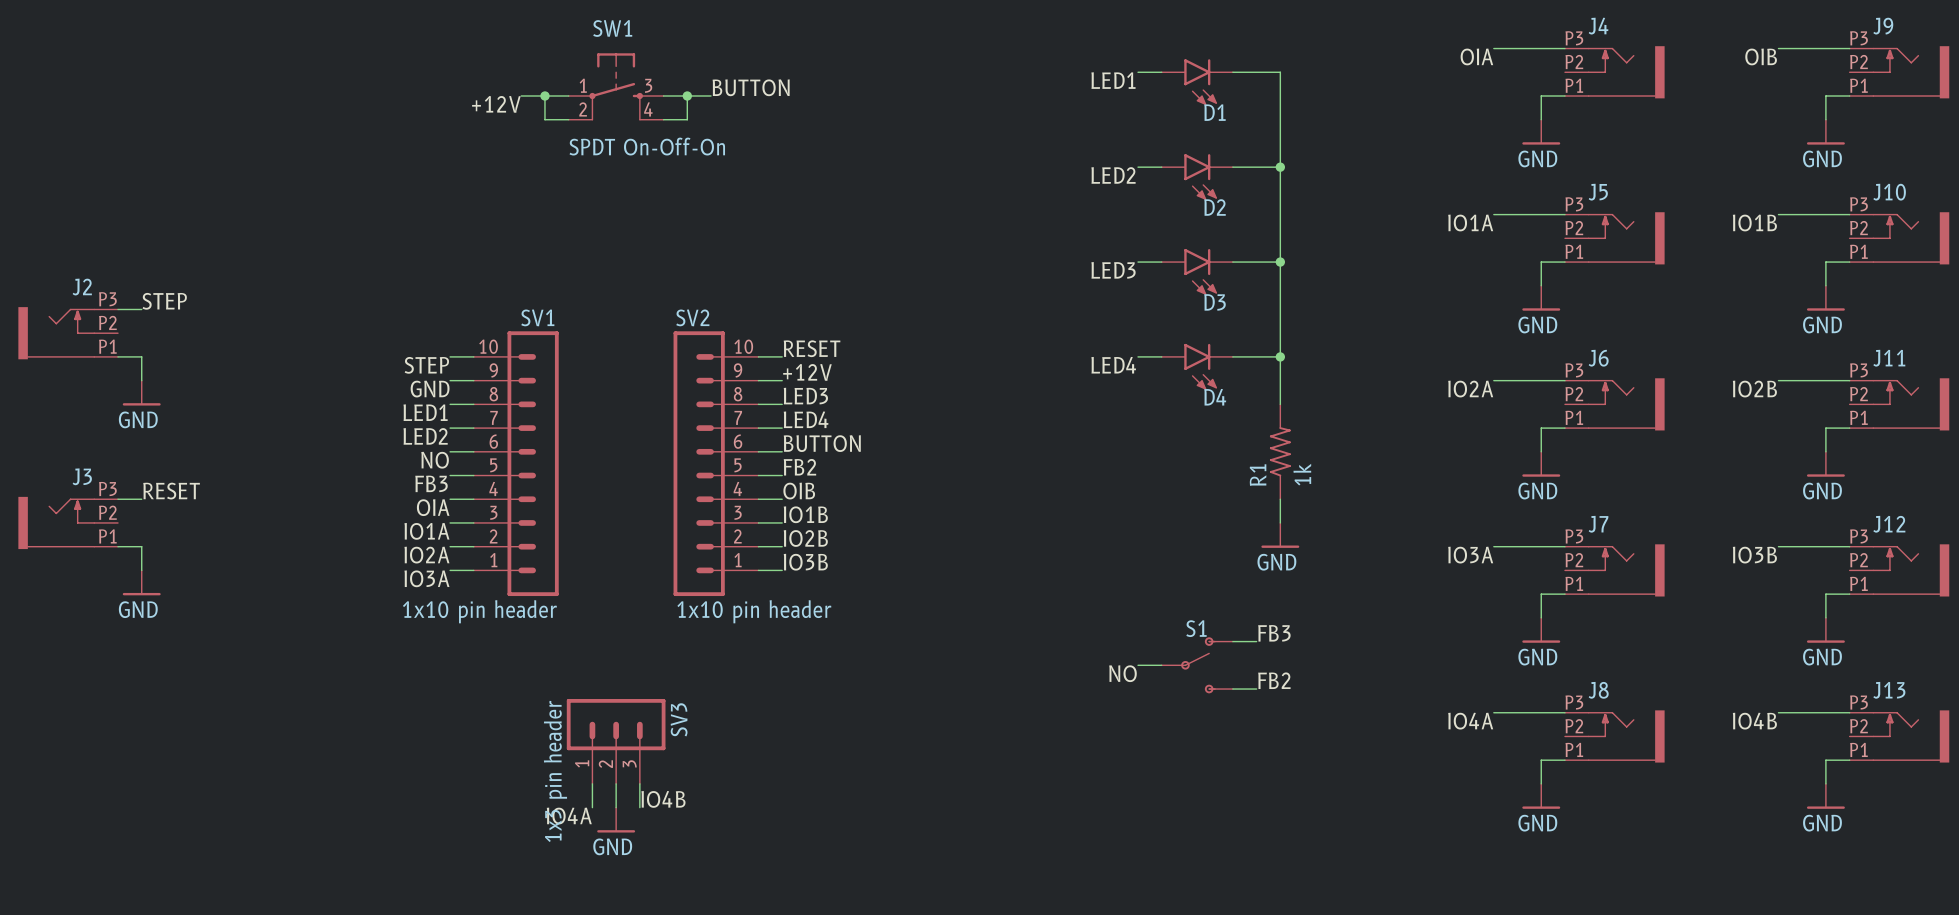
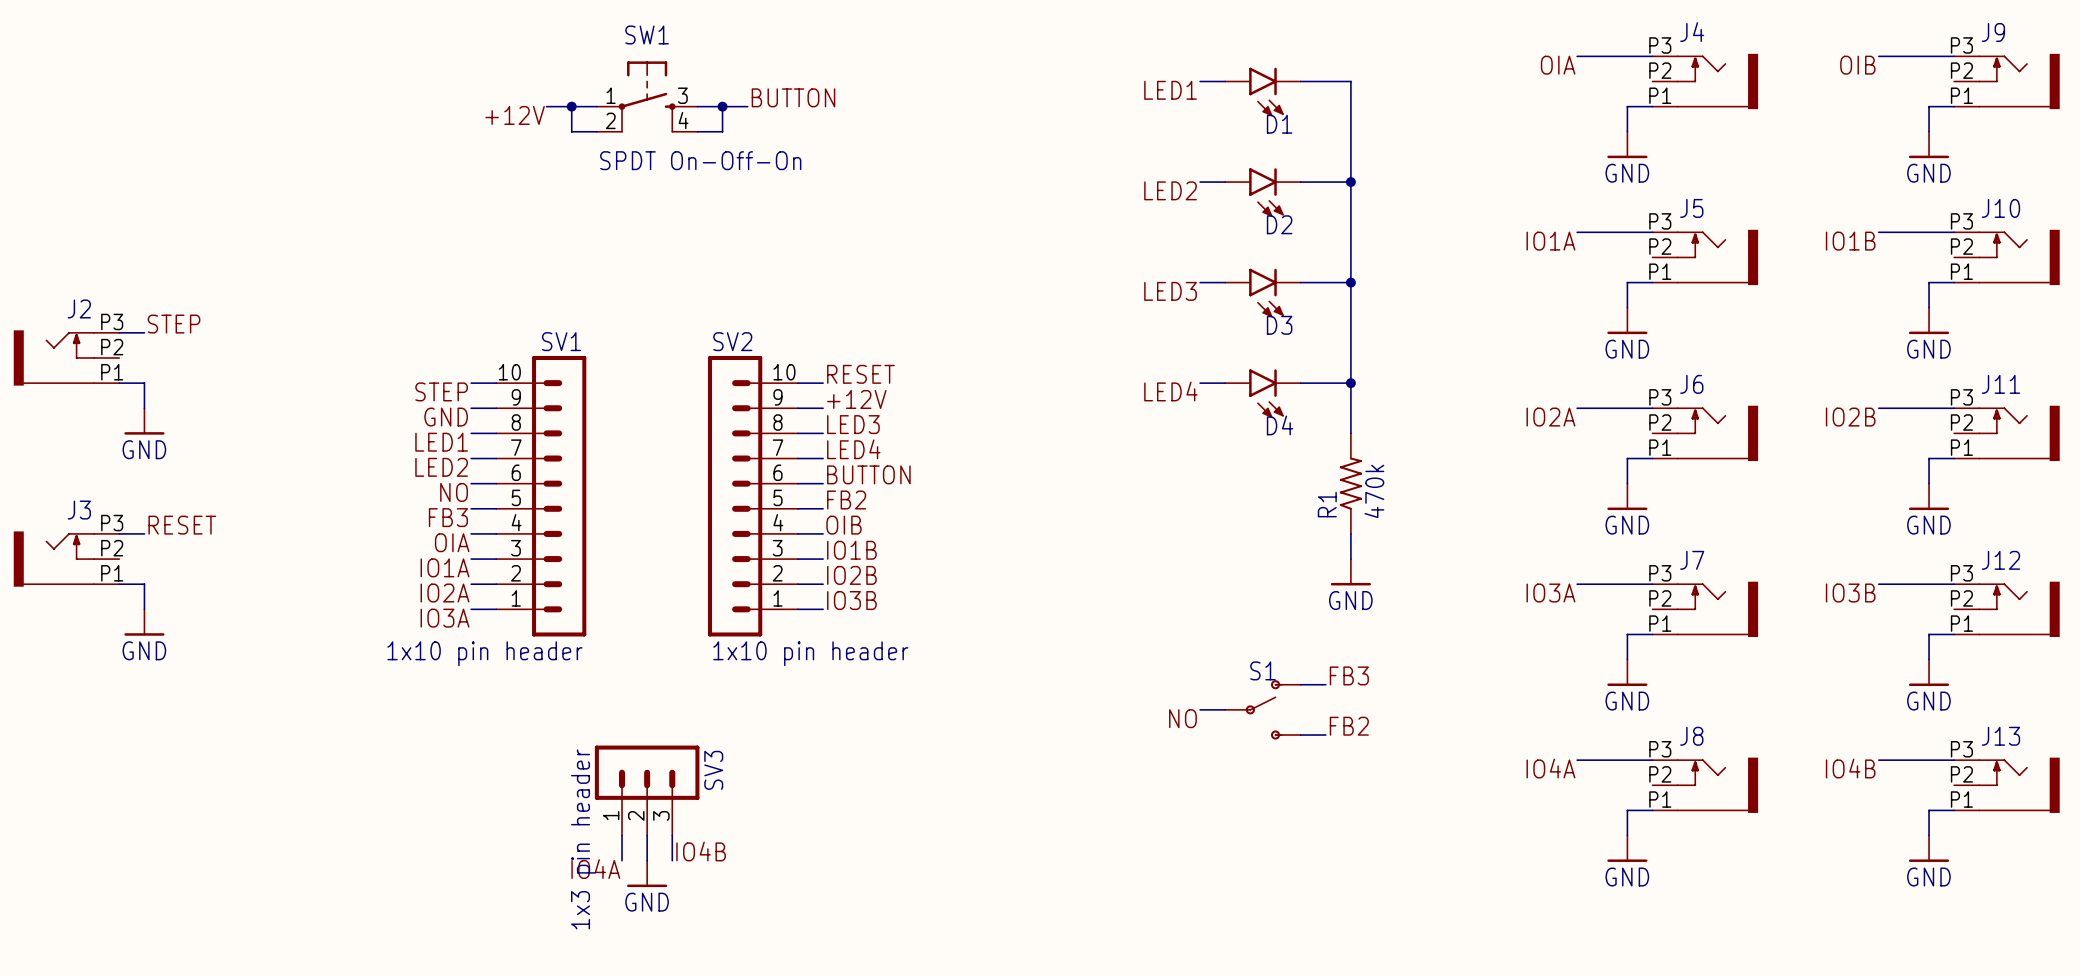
R1 value: 1k (1302, 474) -> 470k (1374, 491)

